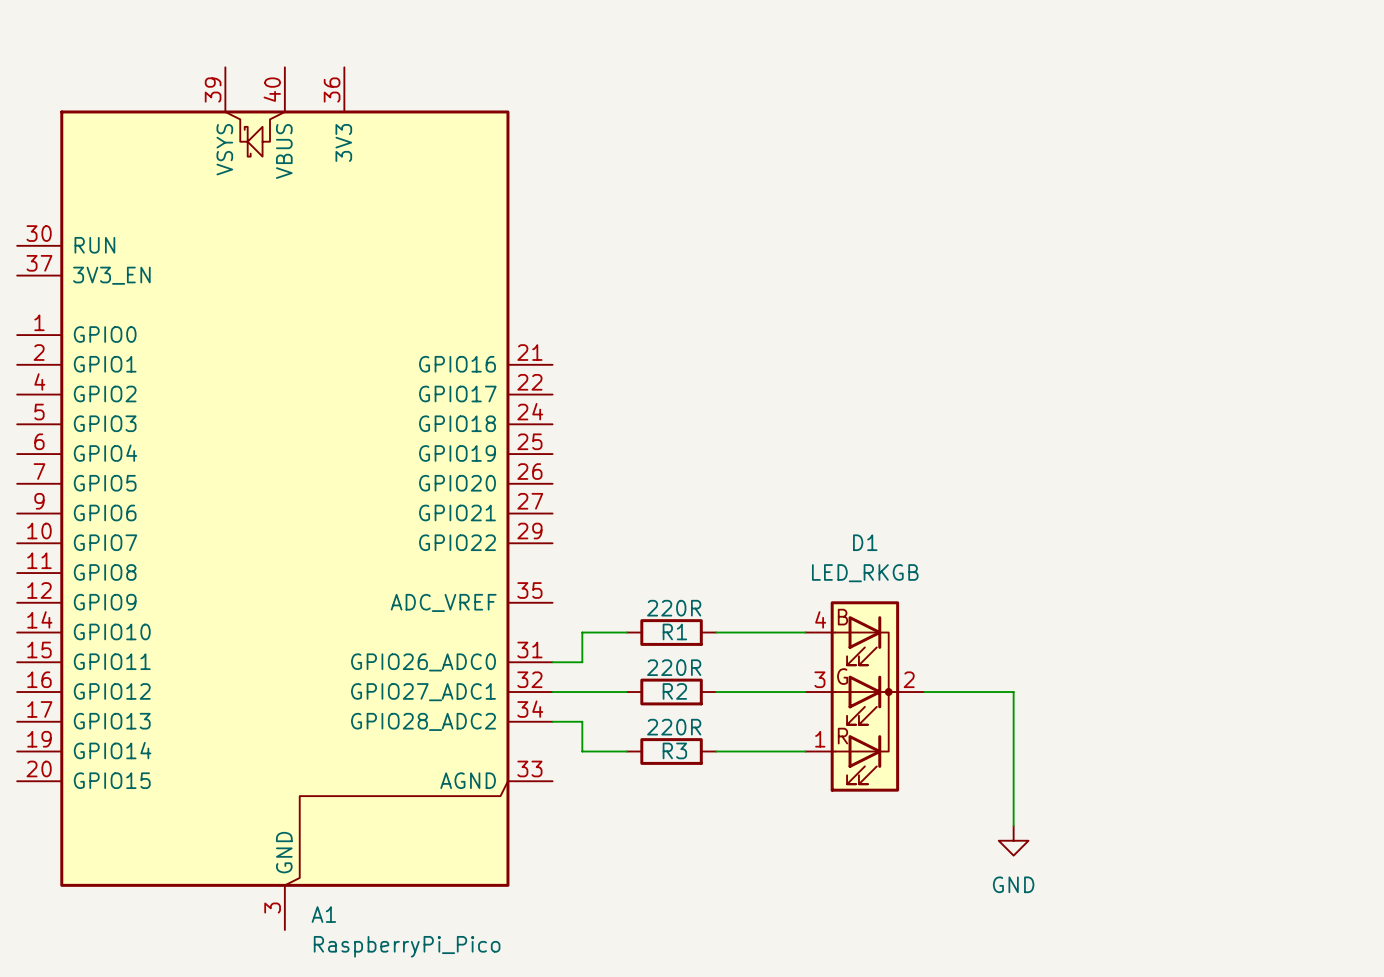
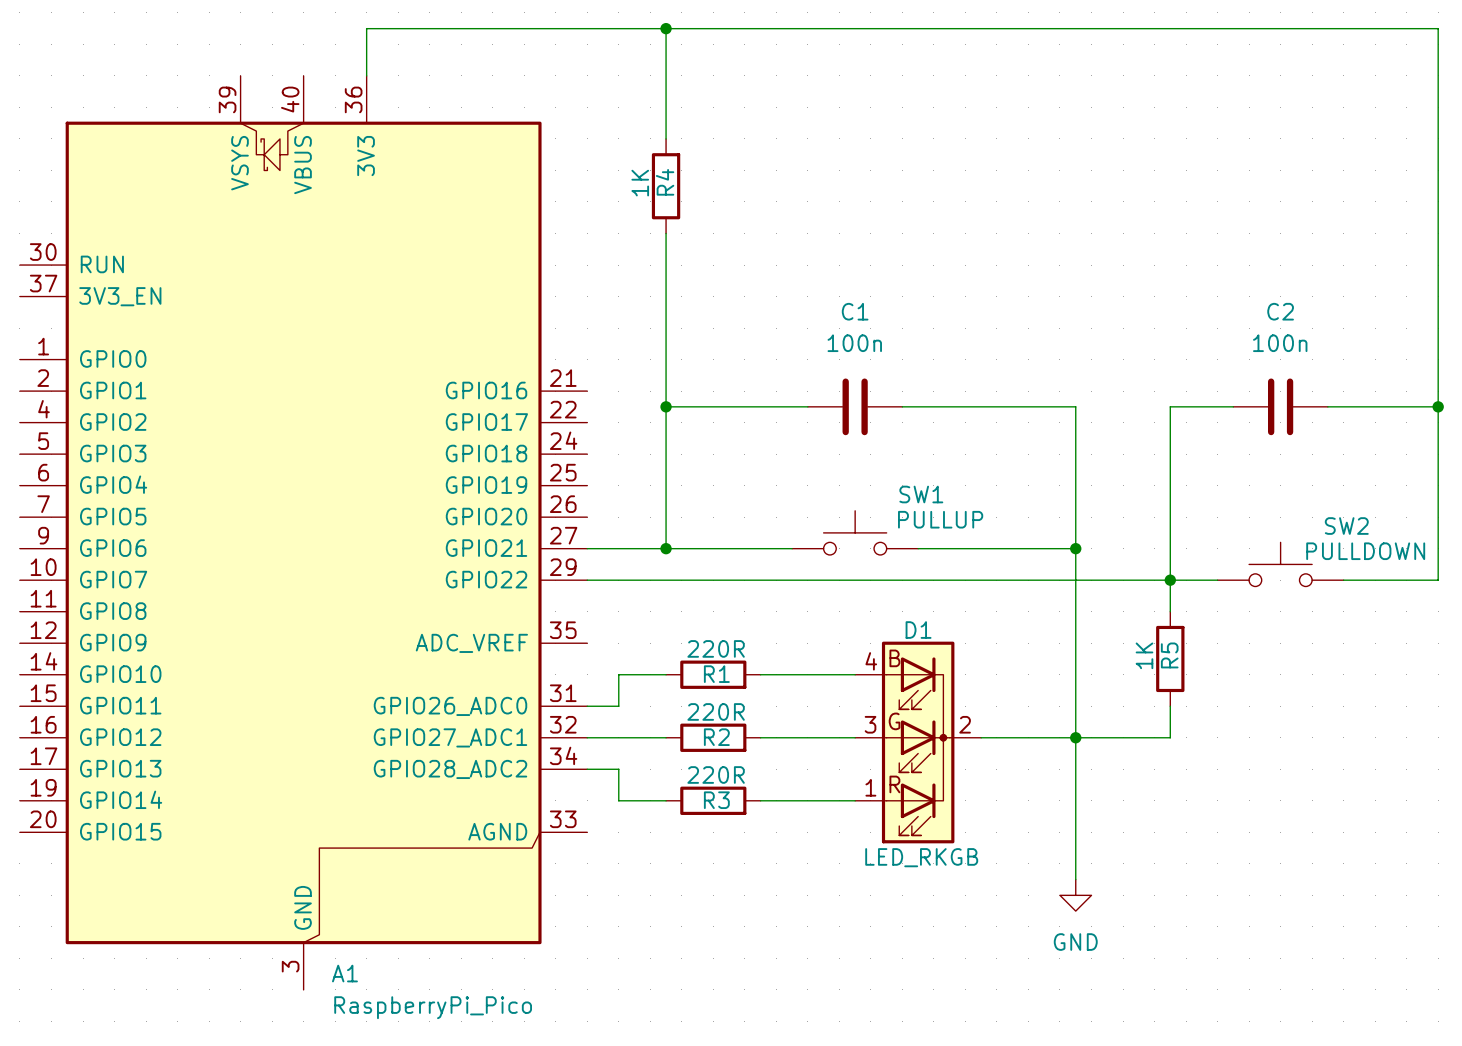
wire: none -> (666, 28) (666, 138)
junction: none -> (666, 28)
wire: none -> (366, 75) (366, 28) (1438, 28) (1438, 580) (1343, 580)
R4: none -> 1K (666, 186)
wire: none -> (666, 233) (666, 548)
wire: none -> (666, 406) (807, 406)
junction: none -> (666, 406)
C1: none -> 100n (855, 406)
wire: none -> (902, 406) (1075, 406) (1075, 737) (1170, 737) (1170, 706)
wire: none -> (1233, 406) (1170, 406) (1170, 611)
C2: none -> 100n (1280, 406)
wire: none -> (1327, 406) (1438, 406)
junction: none -> (1438, 406)
SW1: none -> PULLUP (855, 532)
wire: none -> (587, 548) (792, 548)
junction: none -> (666, 548)
wire: none -> (918, 548) (1075, 548)
junction: none -> (1075, 548)
SW2: none -> PULLDOWN (1280, 564)
D1 name position: D1 (865, 542) -> D1 (918, 630)
wire: none -> (587, 580) (1217, 580)
junction: none -> (1170, 580)
D1 value position: LED_RKGB (865, 573) -> LED_RKGB (921, 857)
R5: none -> 1K (1170, 658)
junction: none -> (1075, 737)

